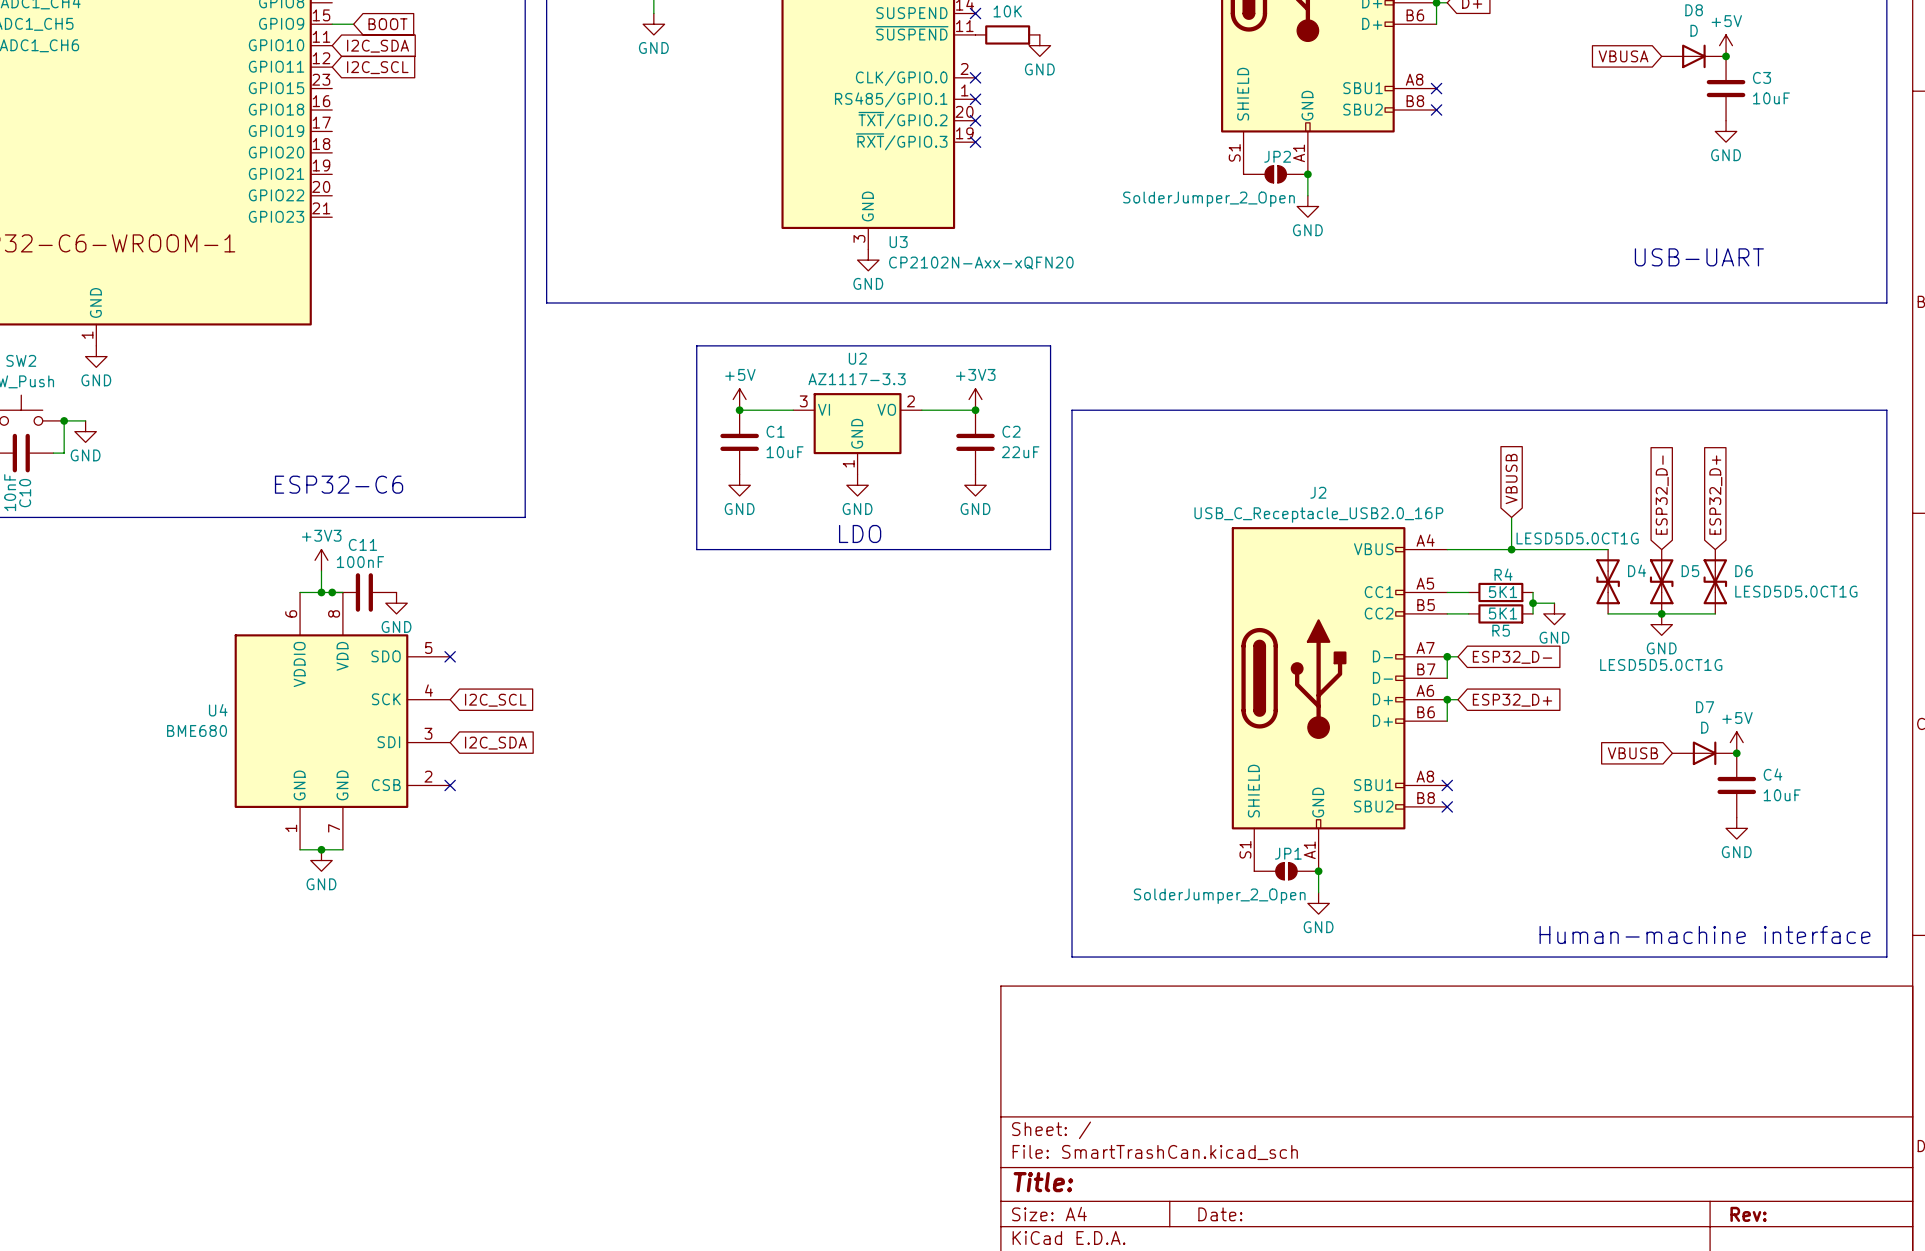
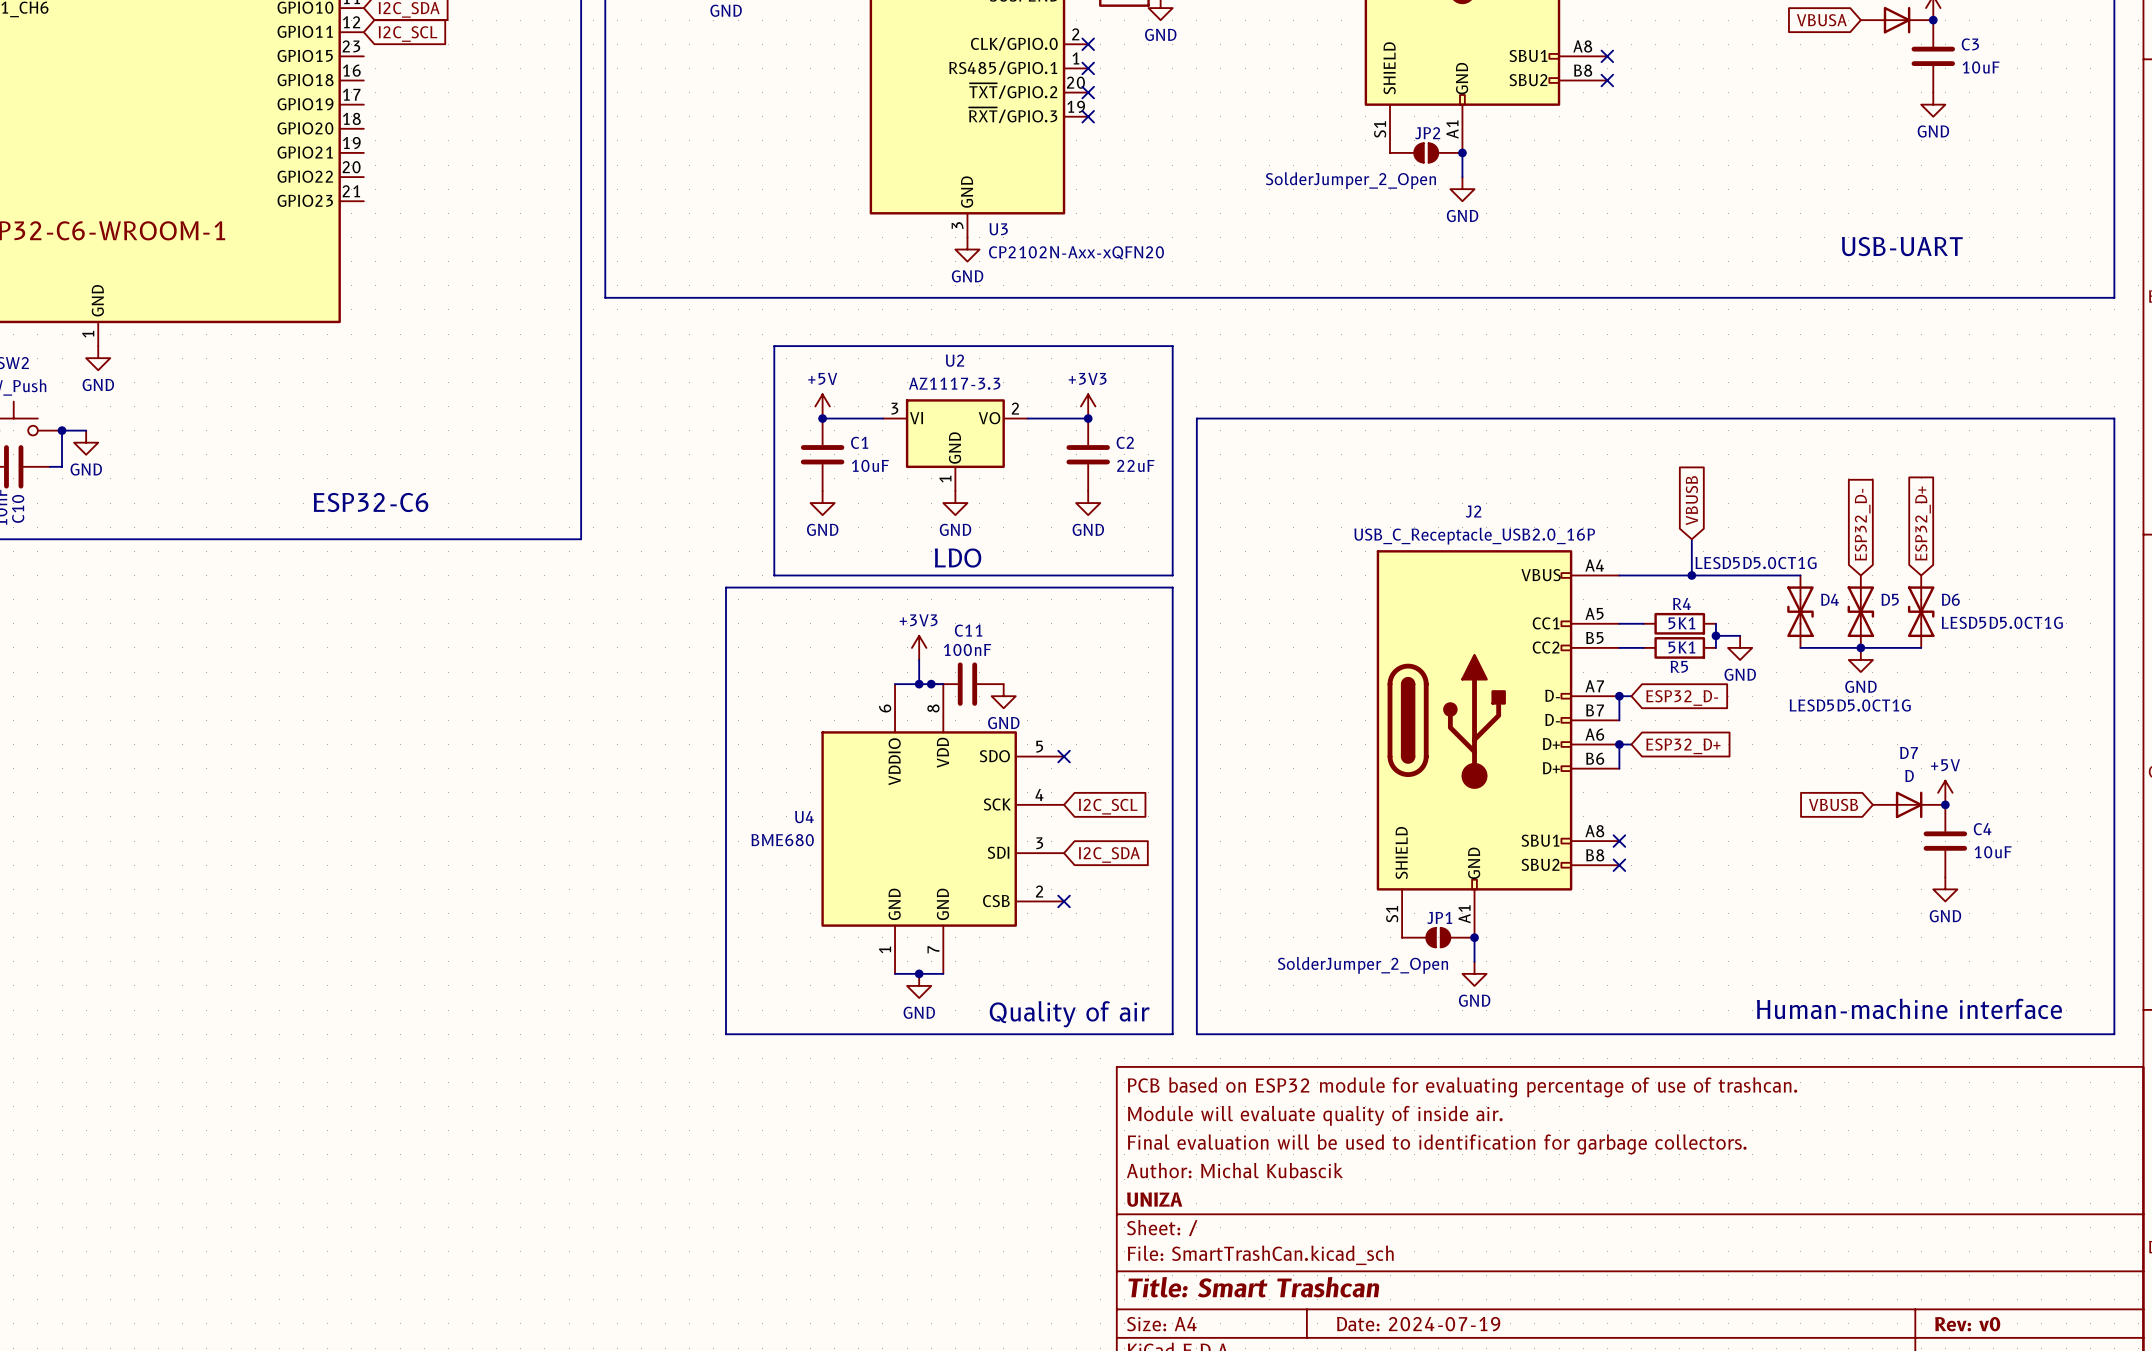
power symbol: +3V3 (321, 560) -> none
line: none -> (726, 587) (1172, 587) (1172, 1034) (726, 1034) (726, 587)
wire: (321, 571) (321, 592) -> none
wire: (300, 592) (342, 592) -> none
junction: (321, 592) -> none
junction: (332, 592) -> none
C11 position: (364, 592) -> (967, 684)
power symbol: GND (396, 603) -> none
power symbol: none -> +3V3 (919, 647)
wire: none -> (919, 659) (919, 684)
wire: none -> (895, 684) (943, 684)
junction: none -> (919, 684)
junction: none -> (931, 684)
no-connect mark: (450, 656) -> none
power symbol: none -> GND (1003, 696)
global label: I2C_SCL (495, 700) -> none
no-connect mark: none -> (1064, 756)
U4 position: (342, 721) -> (942, 829)
global label: I2C_SDA (495, 743) -> none
global label: none -> I2C_SCL (1108, 806)
no-connect mark: (450, 785) -> none
global label: none -> I2C_SDA (1109, 854)
no-connect mark: none -> (1064, 901)
wire: (300, 849) (342, 849) -> none
junction: (321, 849) -> none
power symbol: GND (321, 860) -> none
wire: none -> (895, 973) (943, 973)
junction: none -> (919, 973)
power symbol: none -> GND (919, 985)
text: none -> Quality of air (1069, 1014)
title block: none -> PCB based on ESP32 module for evaluating percentage of use of trashcan. (1462, 1087)
title block: none -> Module will evaluate quality of inside air. (1315, 1115)
title block: none -> Final evaluation will be used to identification for garbage collectors. (1437, 1144)
title block: none -> Author: Michal Kubascik (1234, 1170)
title block: none -> UNIZA (1154, 1199)
title block: Title: (1043, 1182) -> Title: Smart Trashcan (1253, 1287)
title block: Date: (1220, 1214) -> Date: 2024-07-19 (1418, 1324)
title block: Rev: (1748, 1214) -> Rev: v0 (1967, 1324)

